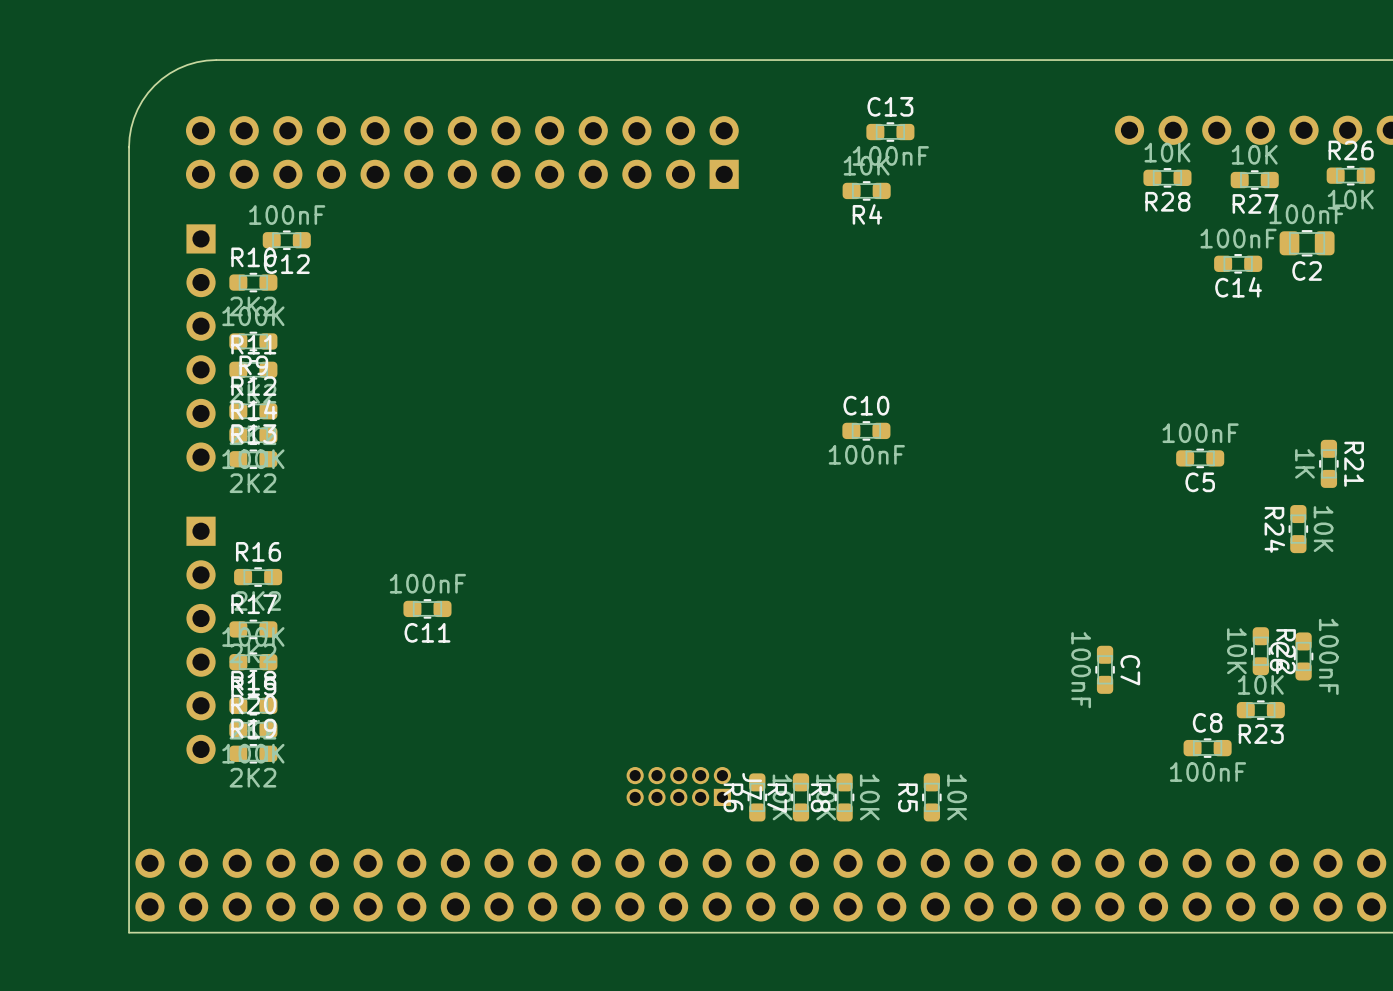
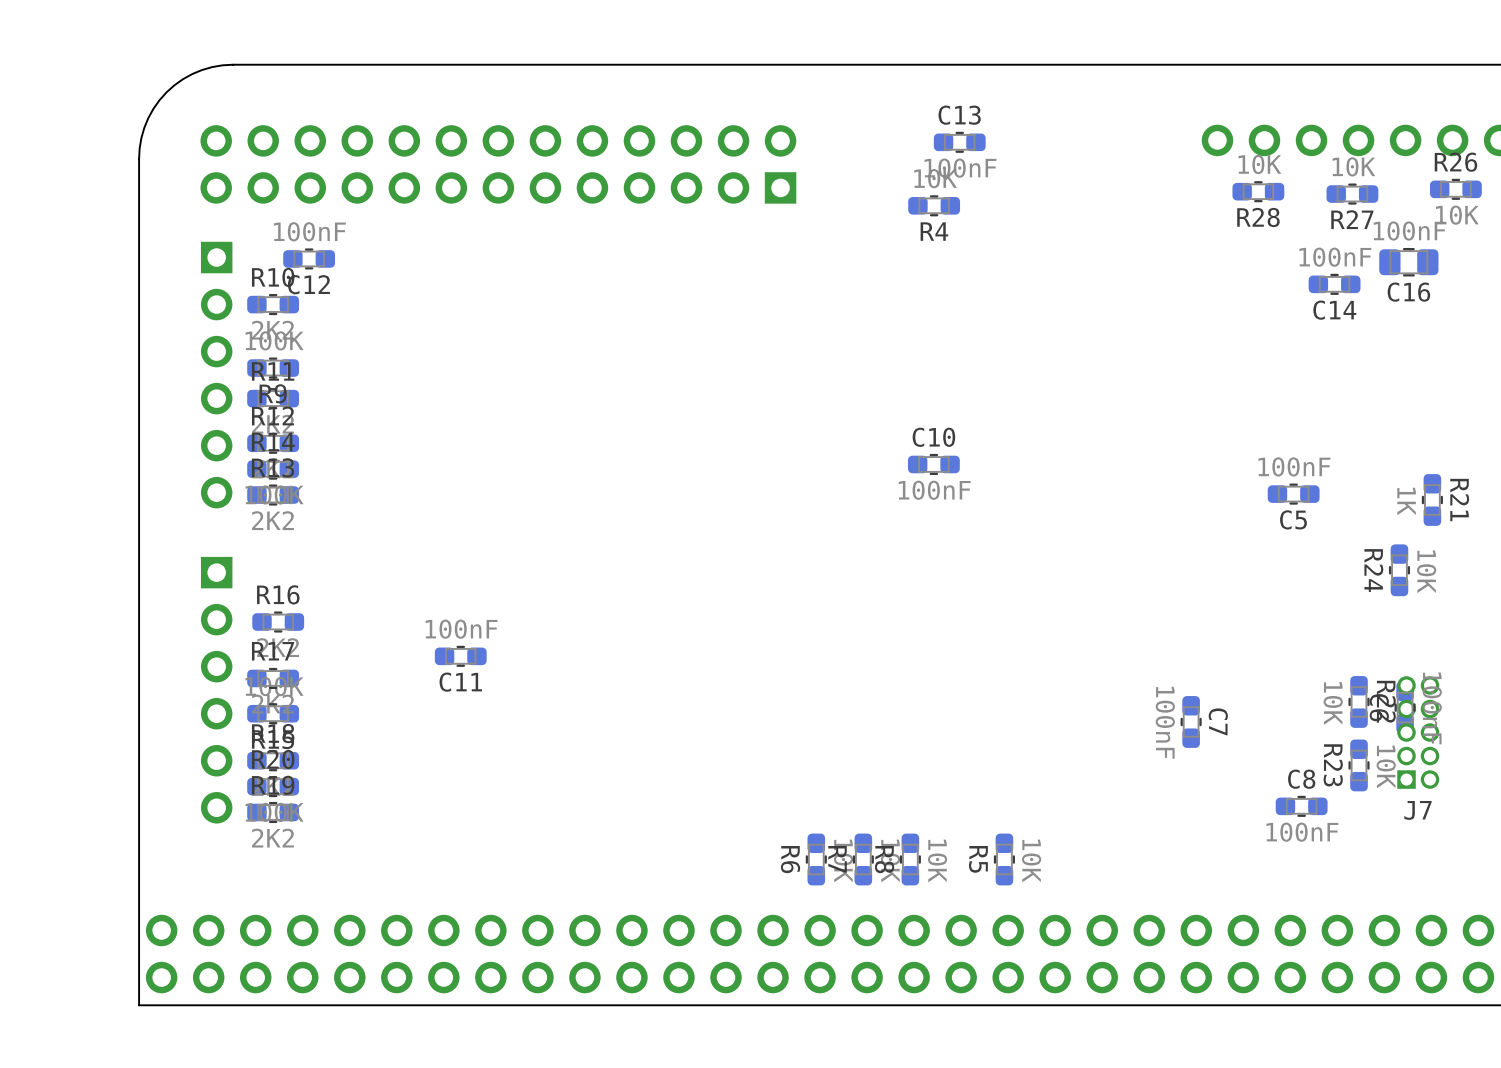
C2 name: C2 (1307, 270) -> C16 (1408, 292)
R23 rotation: 0° (1260, 710) -> 90° clockwise (1359, 765)
J7 rotation: 0° (678, 786) -> 90° clockwise (1418, 732)
J7 position: (678, 786) -> (1418, 732)

